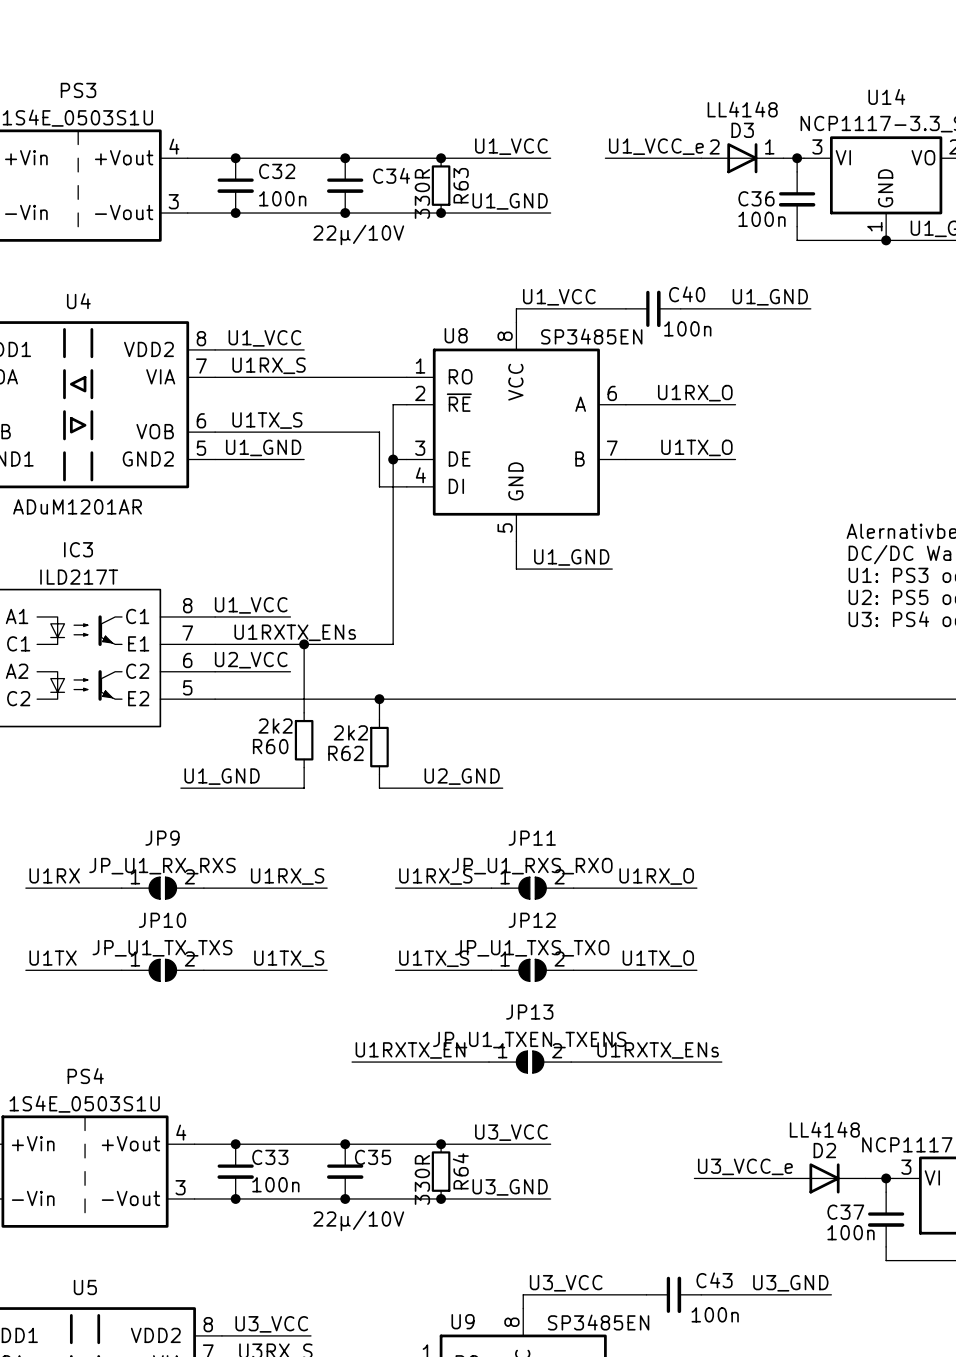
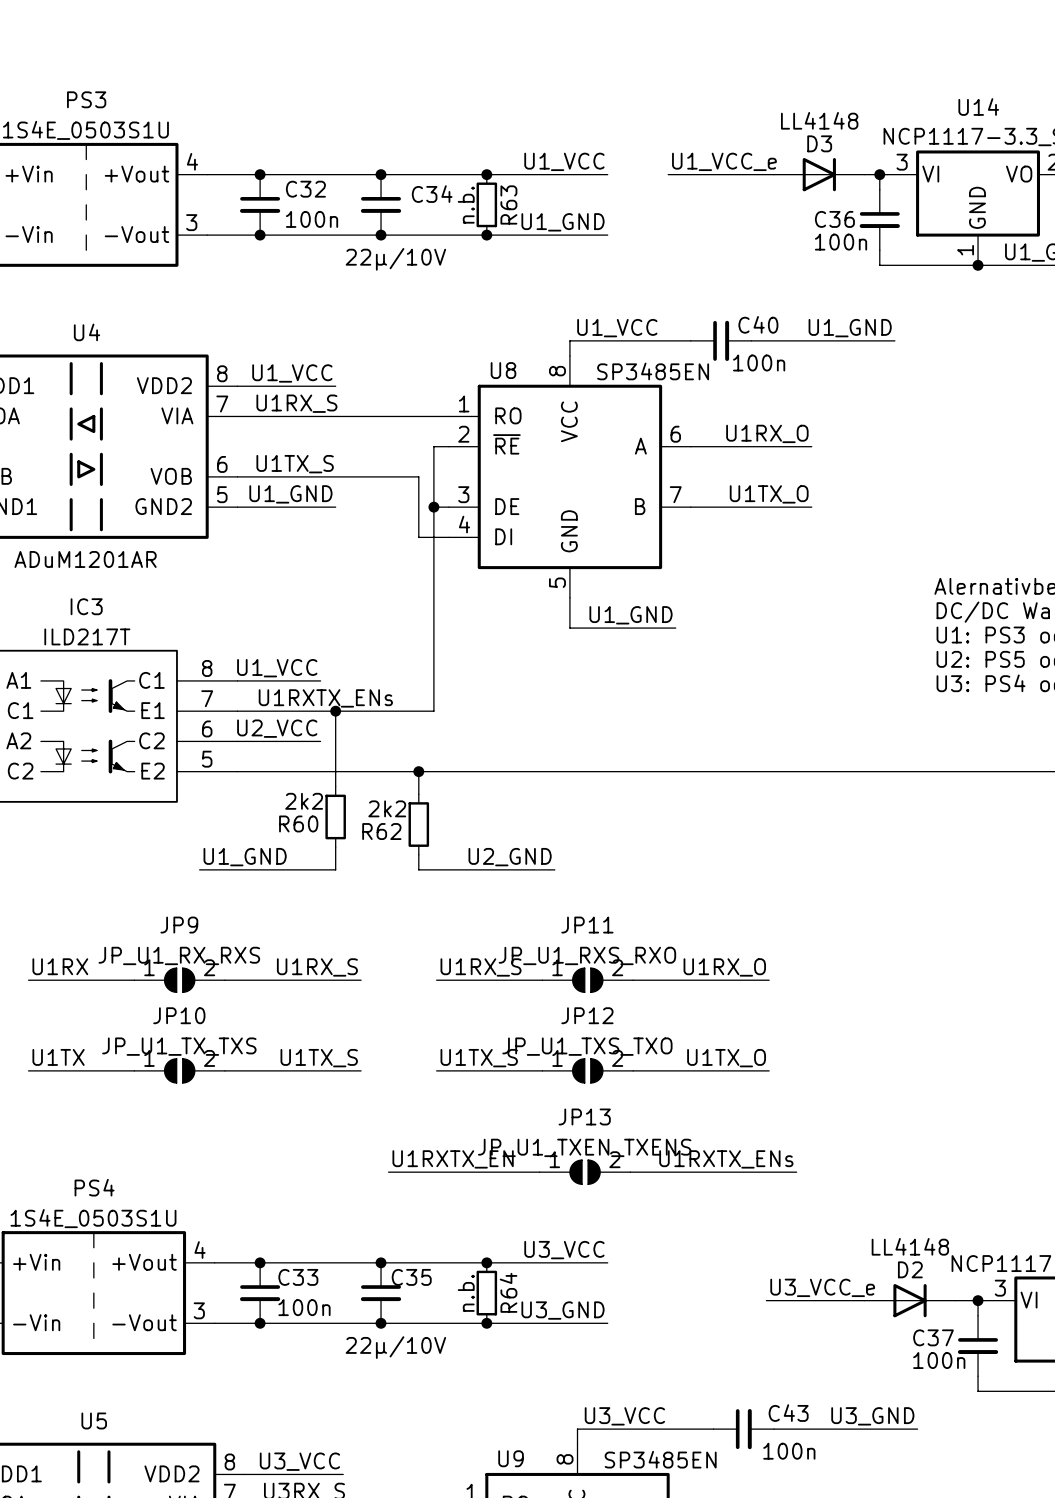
D3 pin number: 2 (714, 146) -> none
D3 pin number: 1 (769, 146) -> none
R63 value: 330R (422, 193) -> n.b. (466, 205)
R64 value: 330R (422, 1179) -> n.b. (466, 1293)

